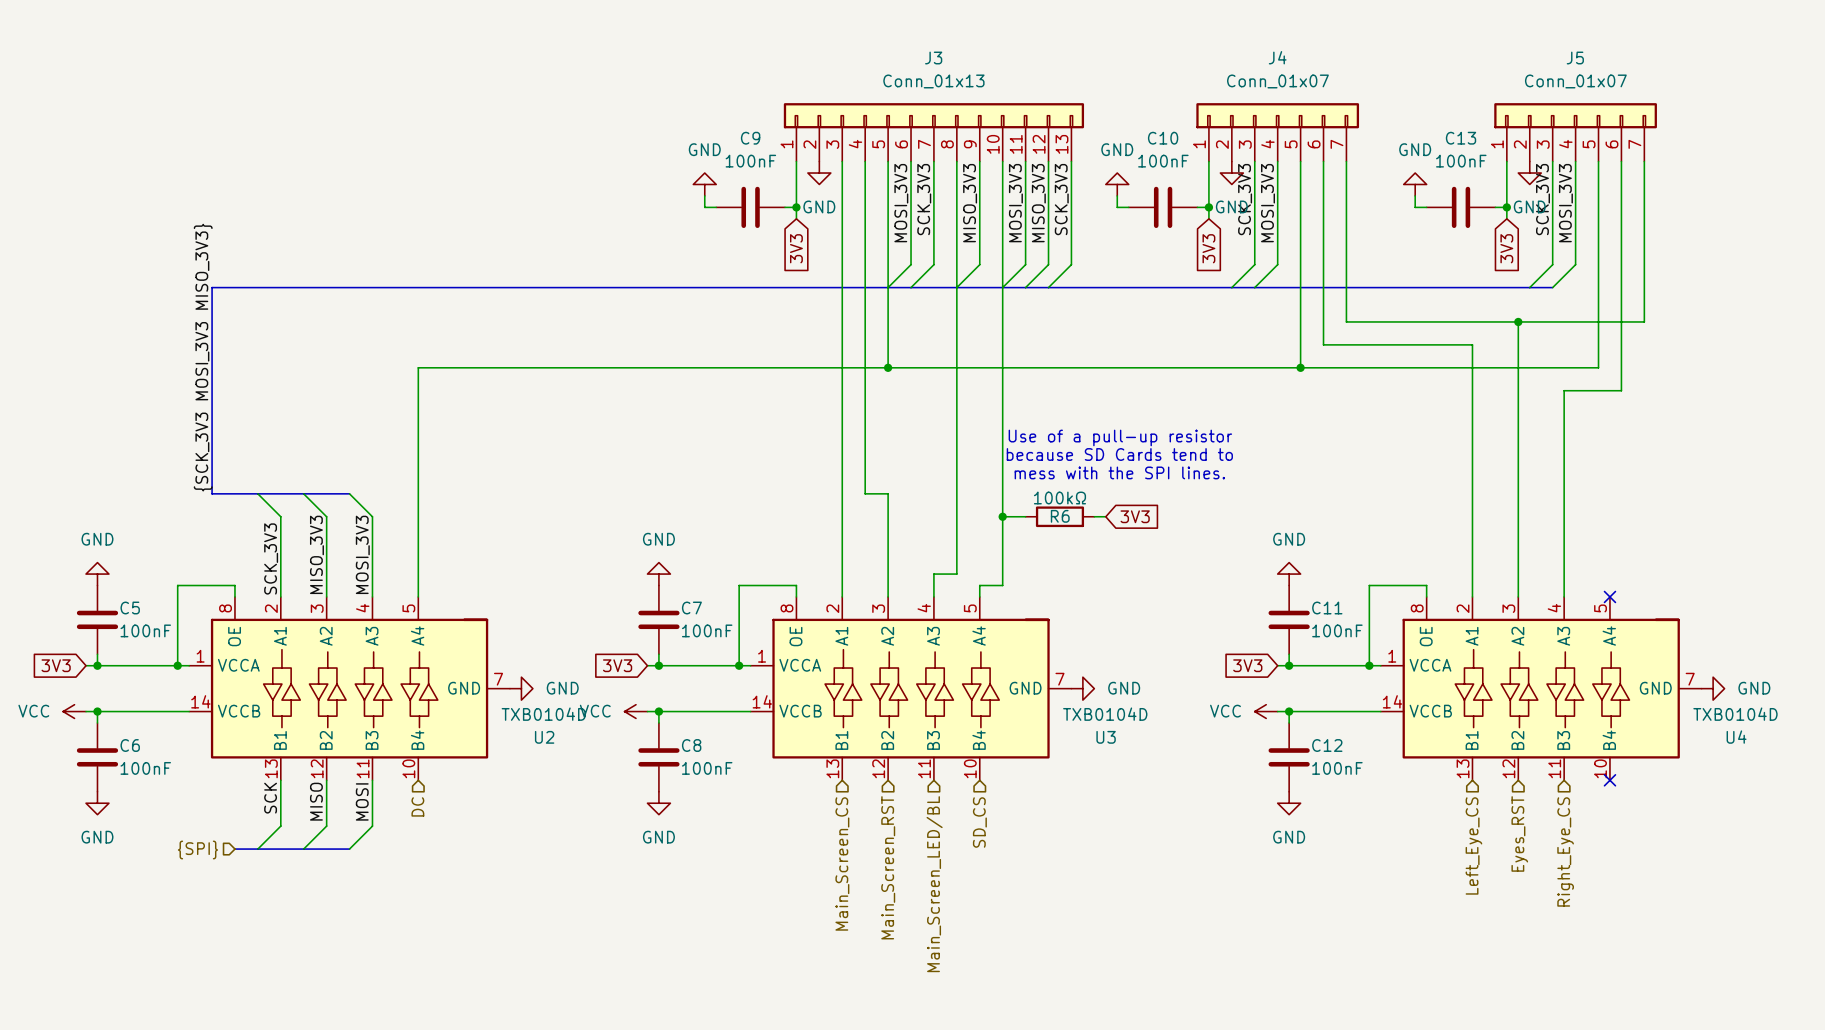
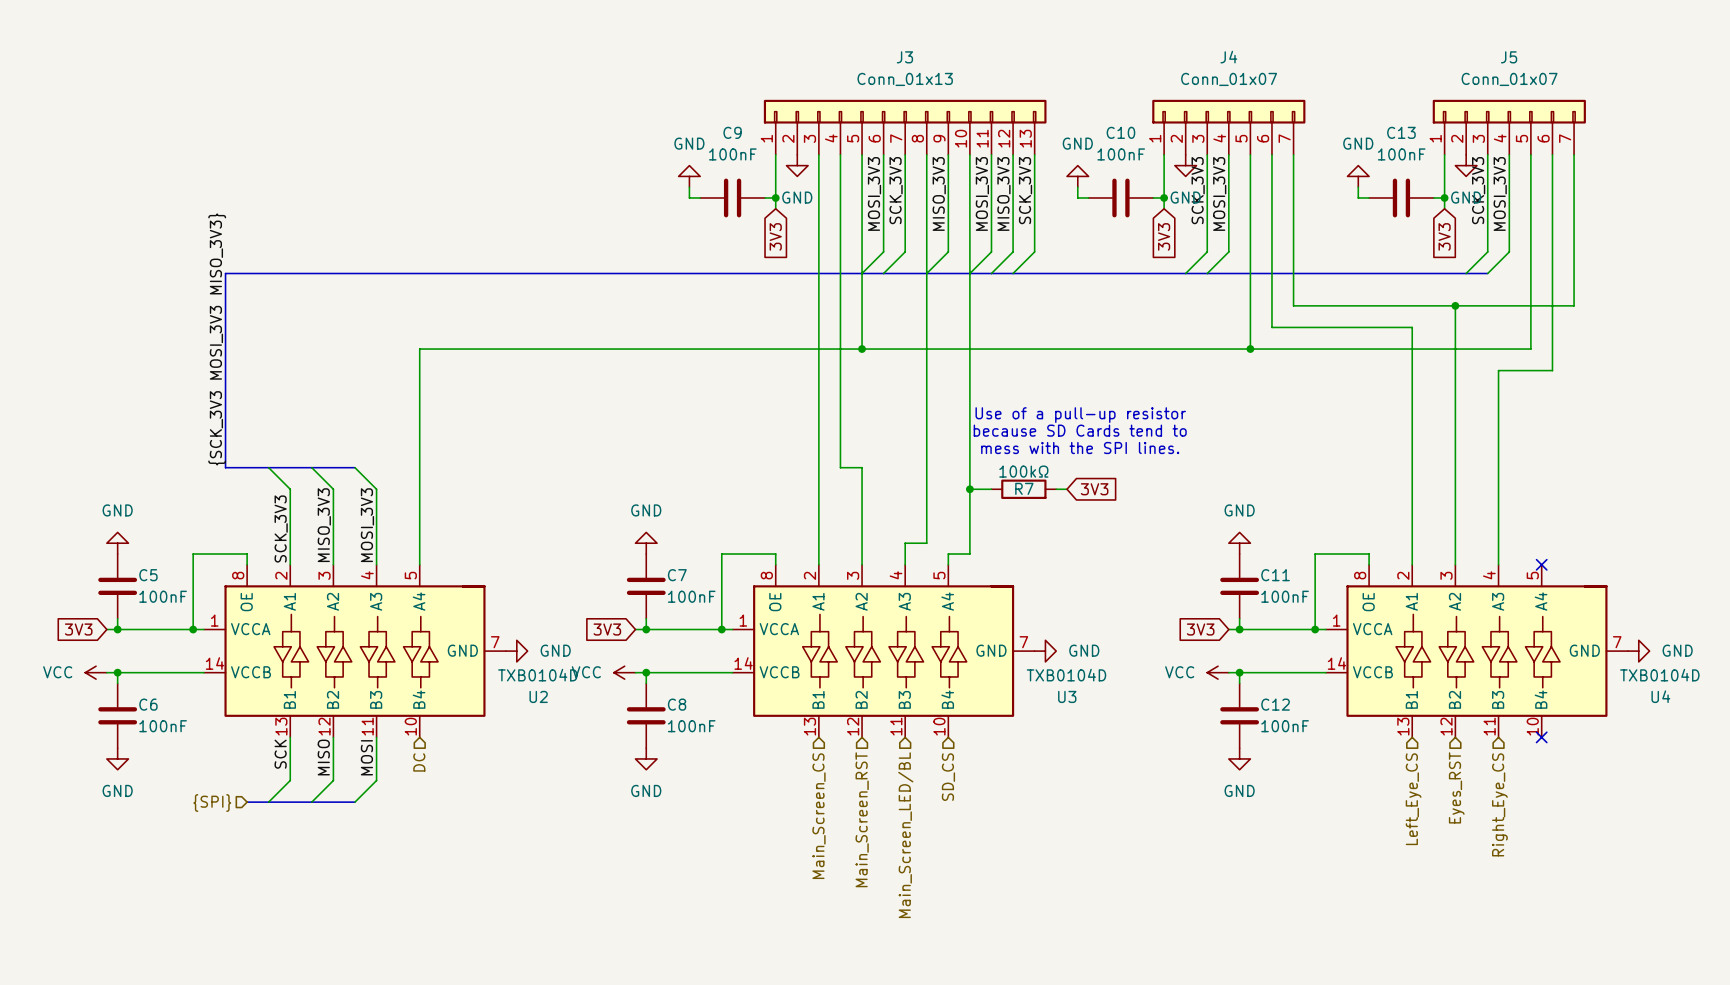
R6 name: R6 (1060, 516) -> R7 (1024, 488)

